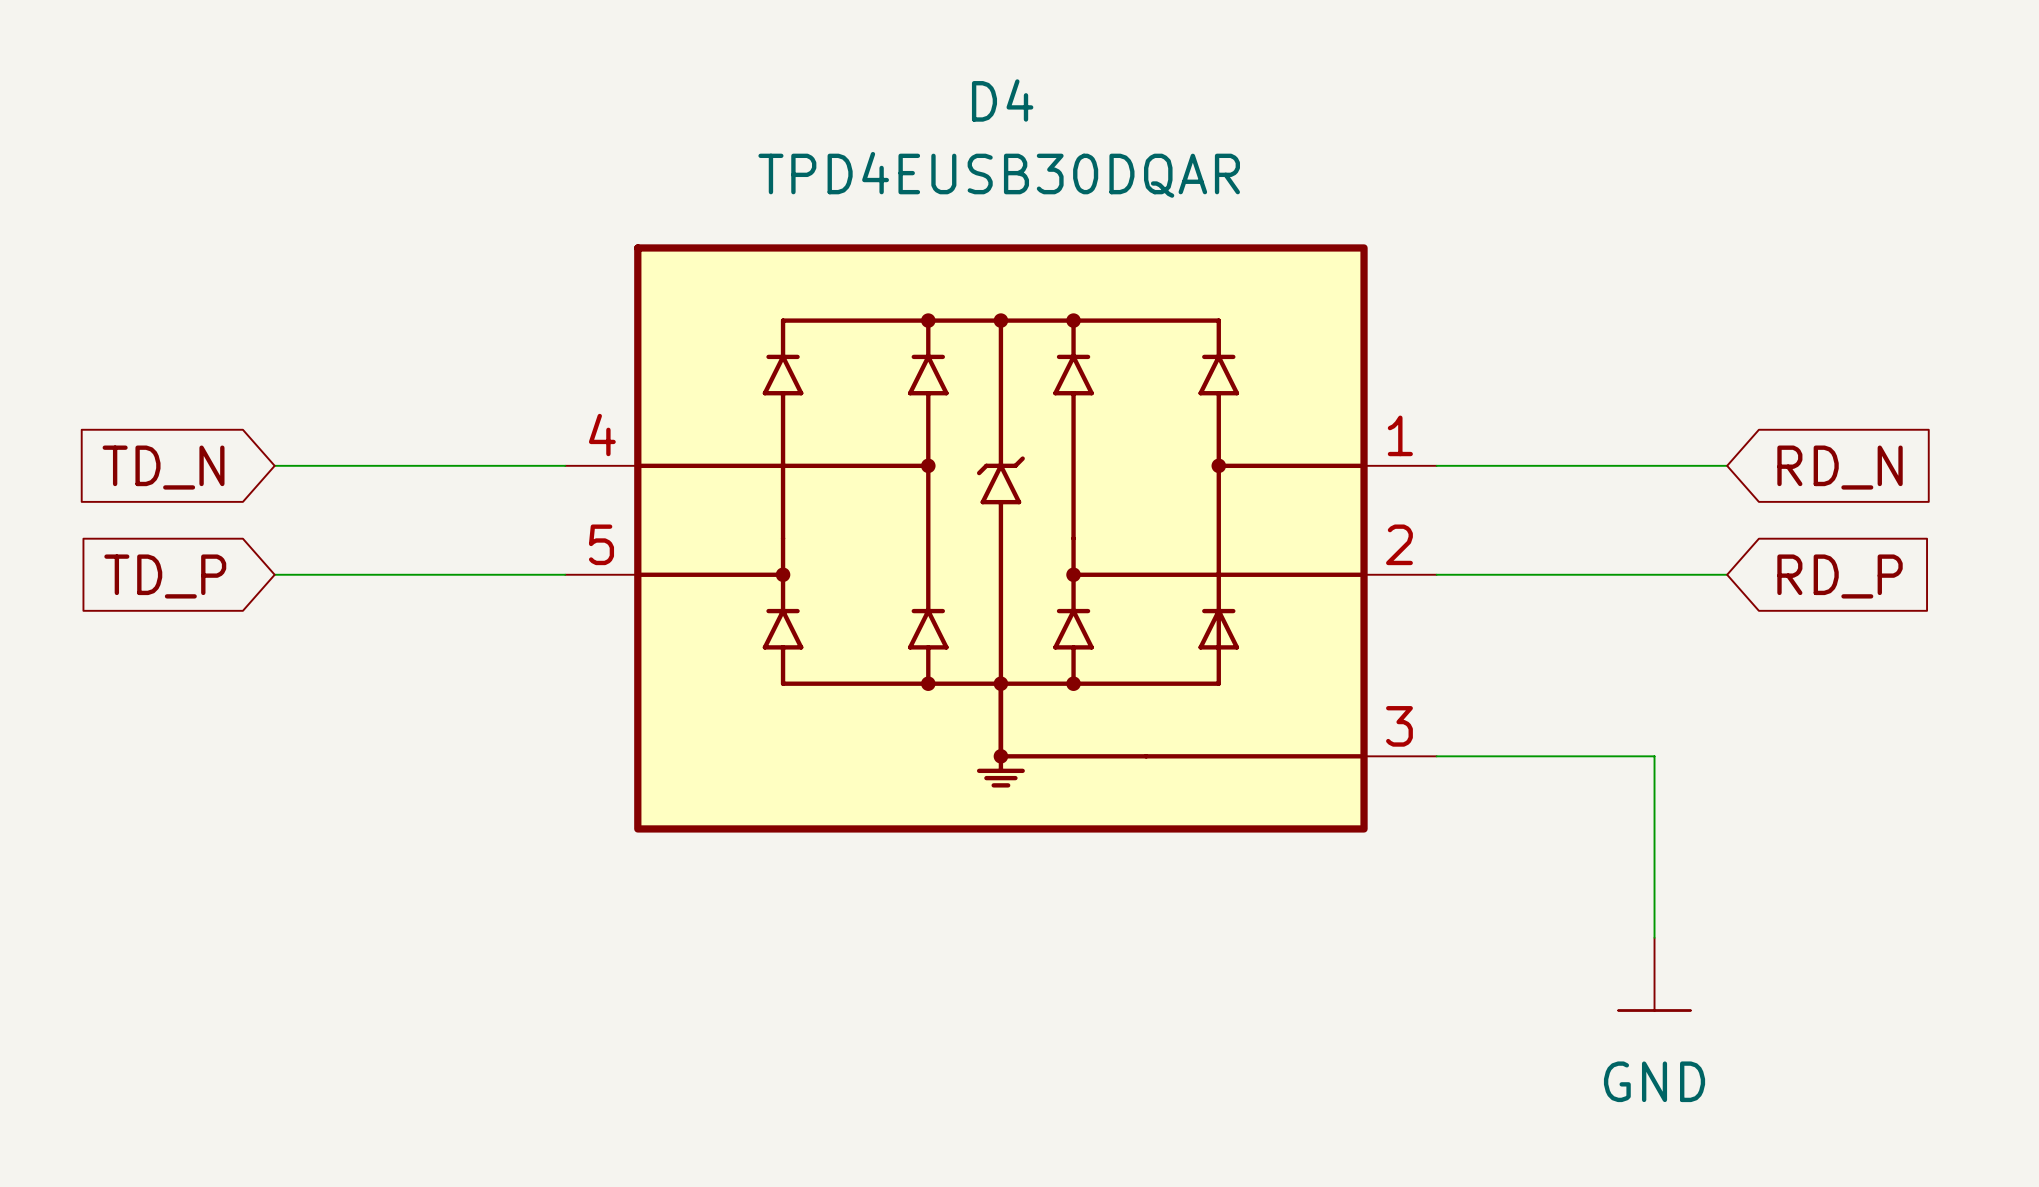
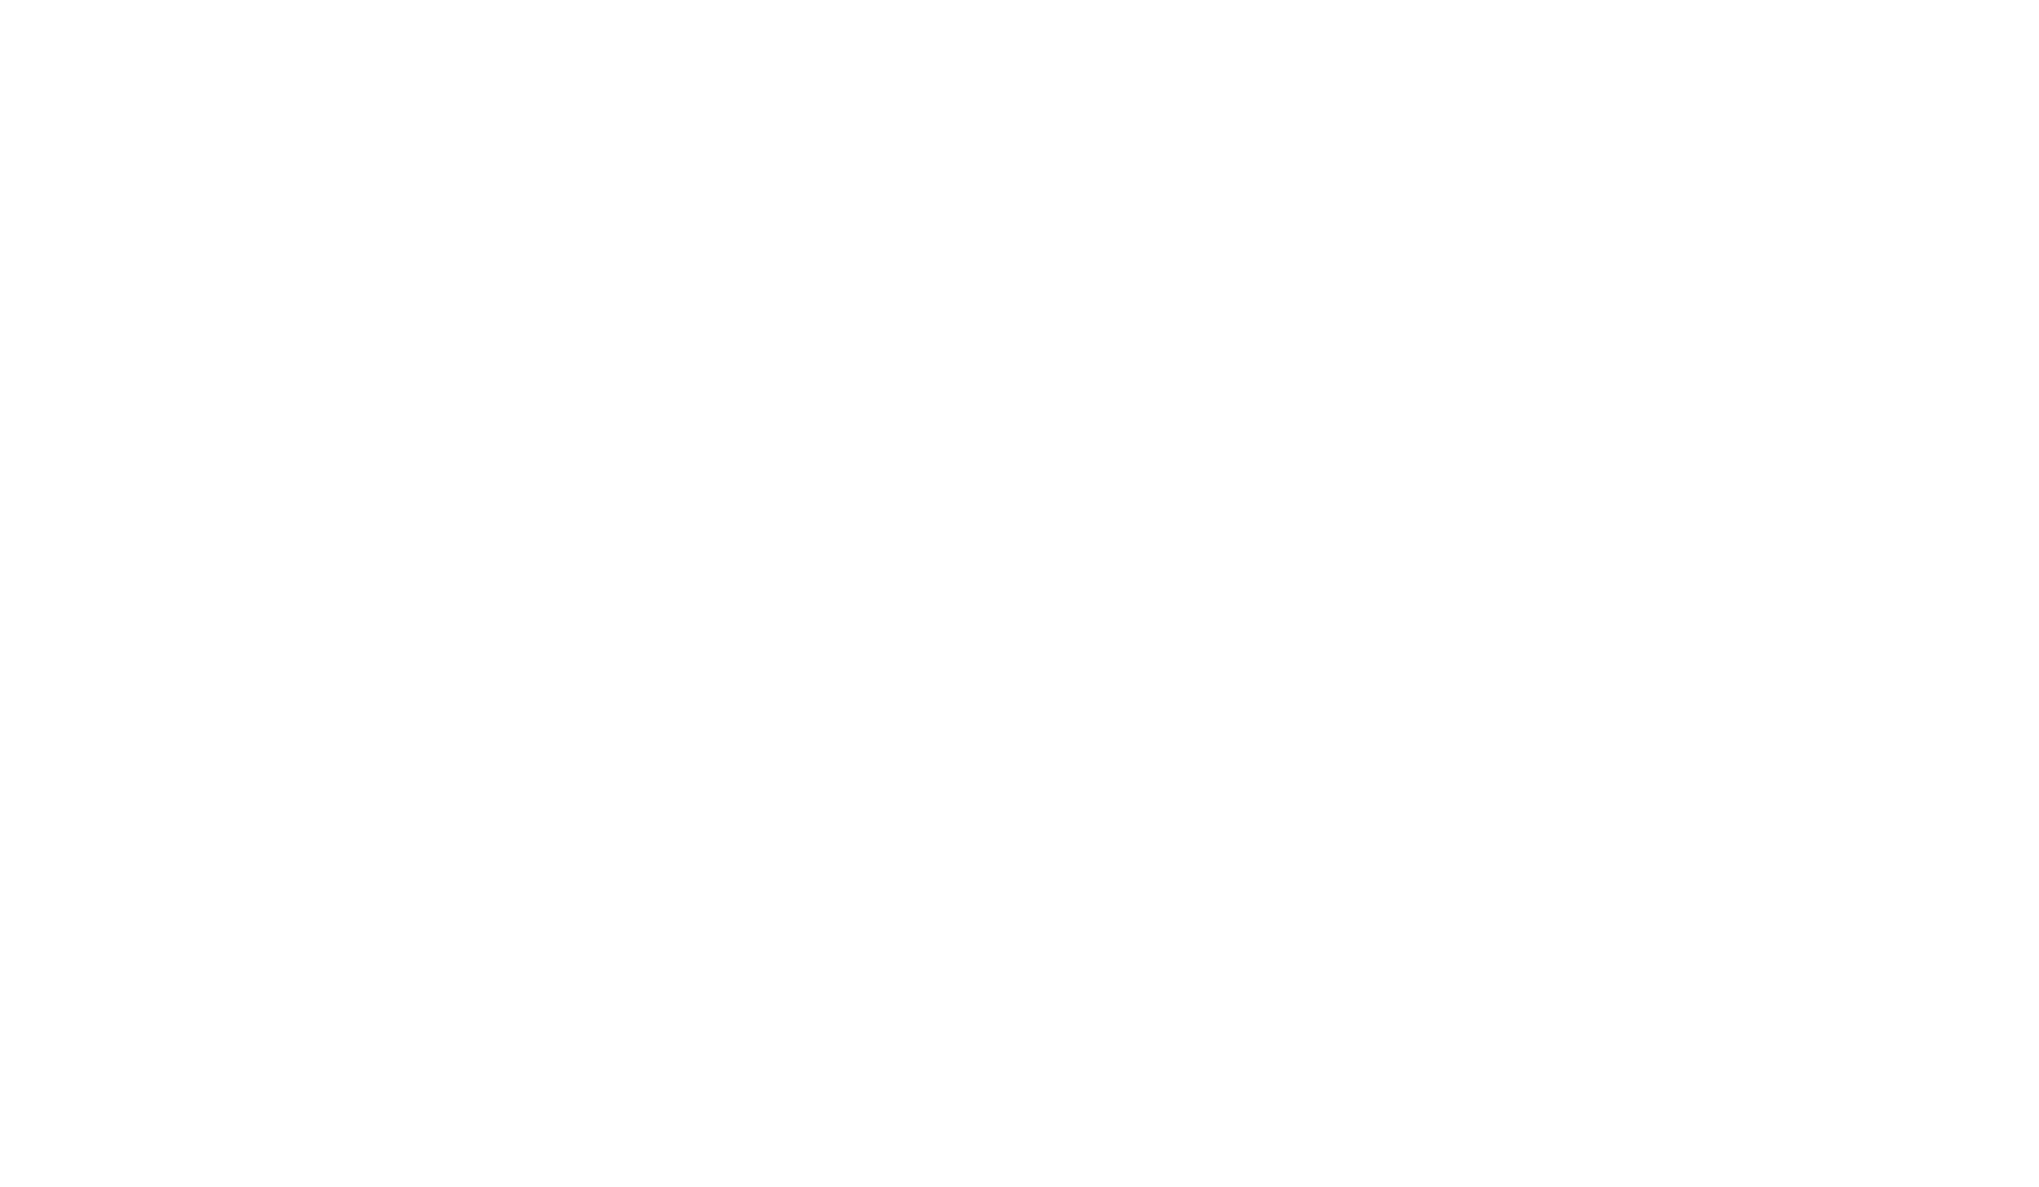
wire: (274, 465) (565, 465) -> none
wire: (1436, 465) (1727, 465) -> none
global label: TD_N (163, 467) -> none
global label: RD_N (1840, 467) -> none
D4: TPD4EUSB30DQAR (1000, 538) -> none
wire: (274, 574) (565, 574) -> none
wire: (1436, 574) (1727, 574) -> none
global label: TD_P (165, 576) -> none
global label: RD_P (1840, 576) -> none
wire: (1436, 756) (1654, 756) (1654, 937) -> none
power symbol: GND (1654, 974) -> none

